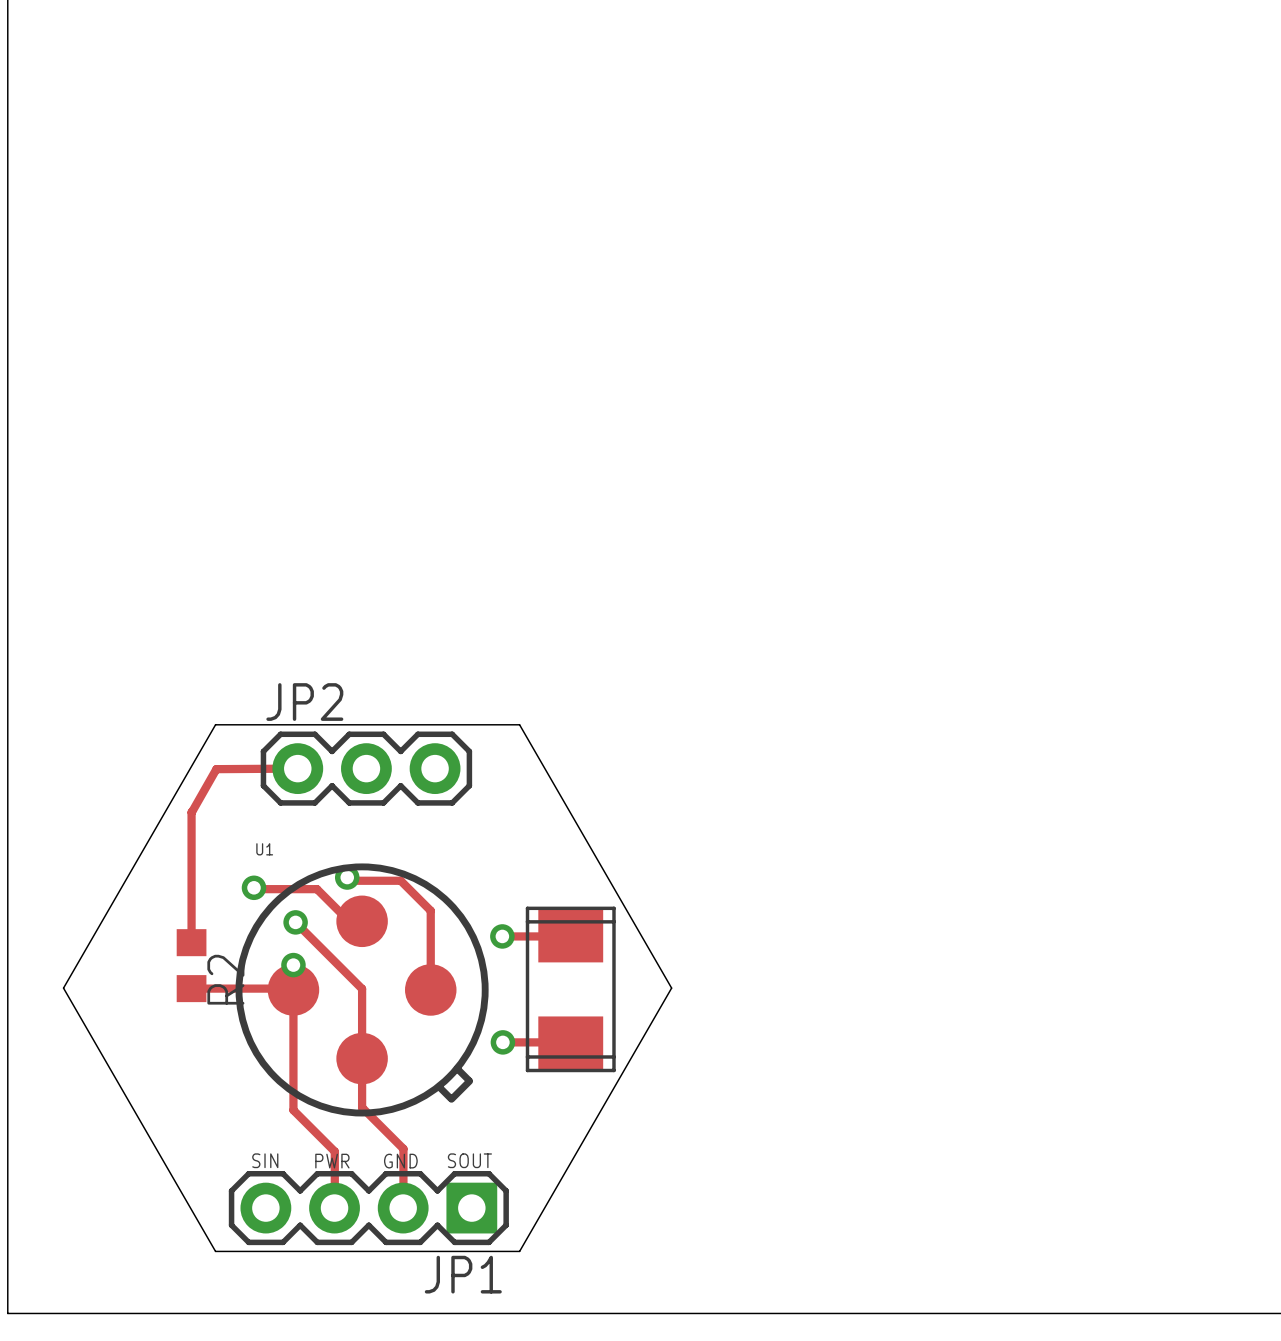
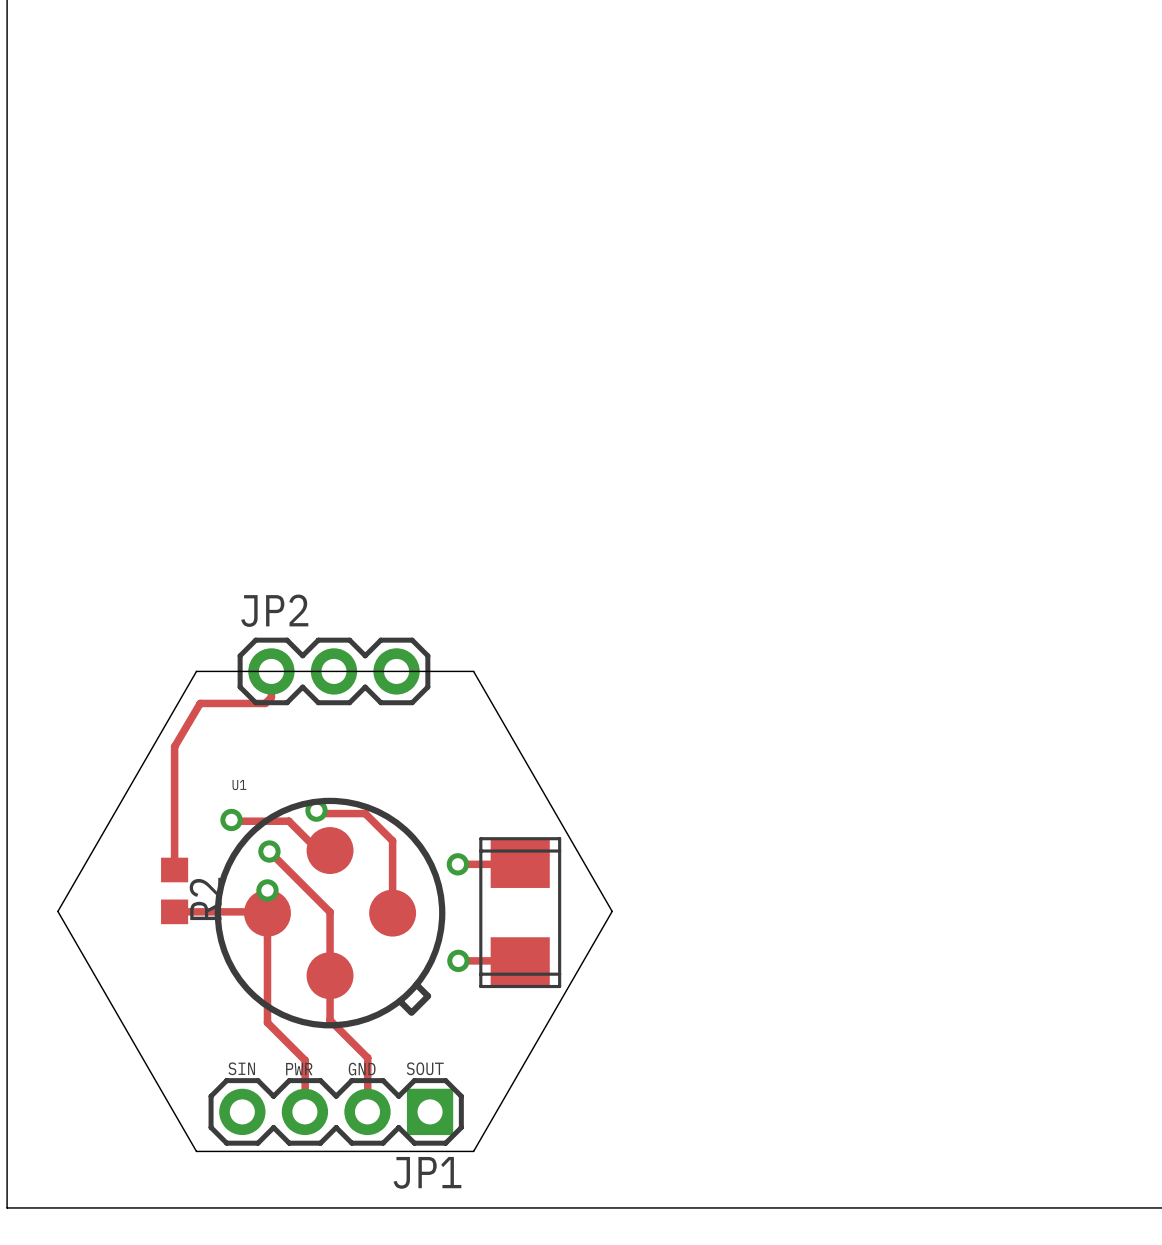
track: (297, 768) (216, 769) (191, 812) -> (271, 671) (271, 697) (265, 703) (200, 703) (174, 746) (174, 751)
JP2 position: (366, 768) -> (333, 671)

